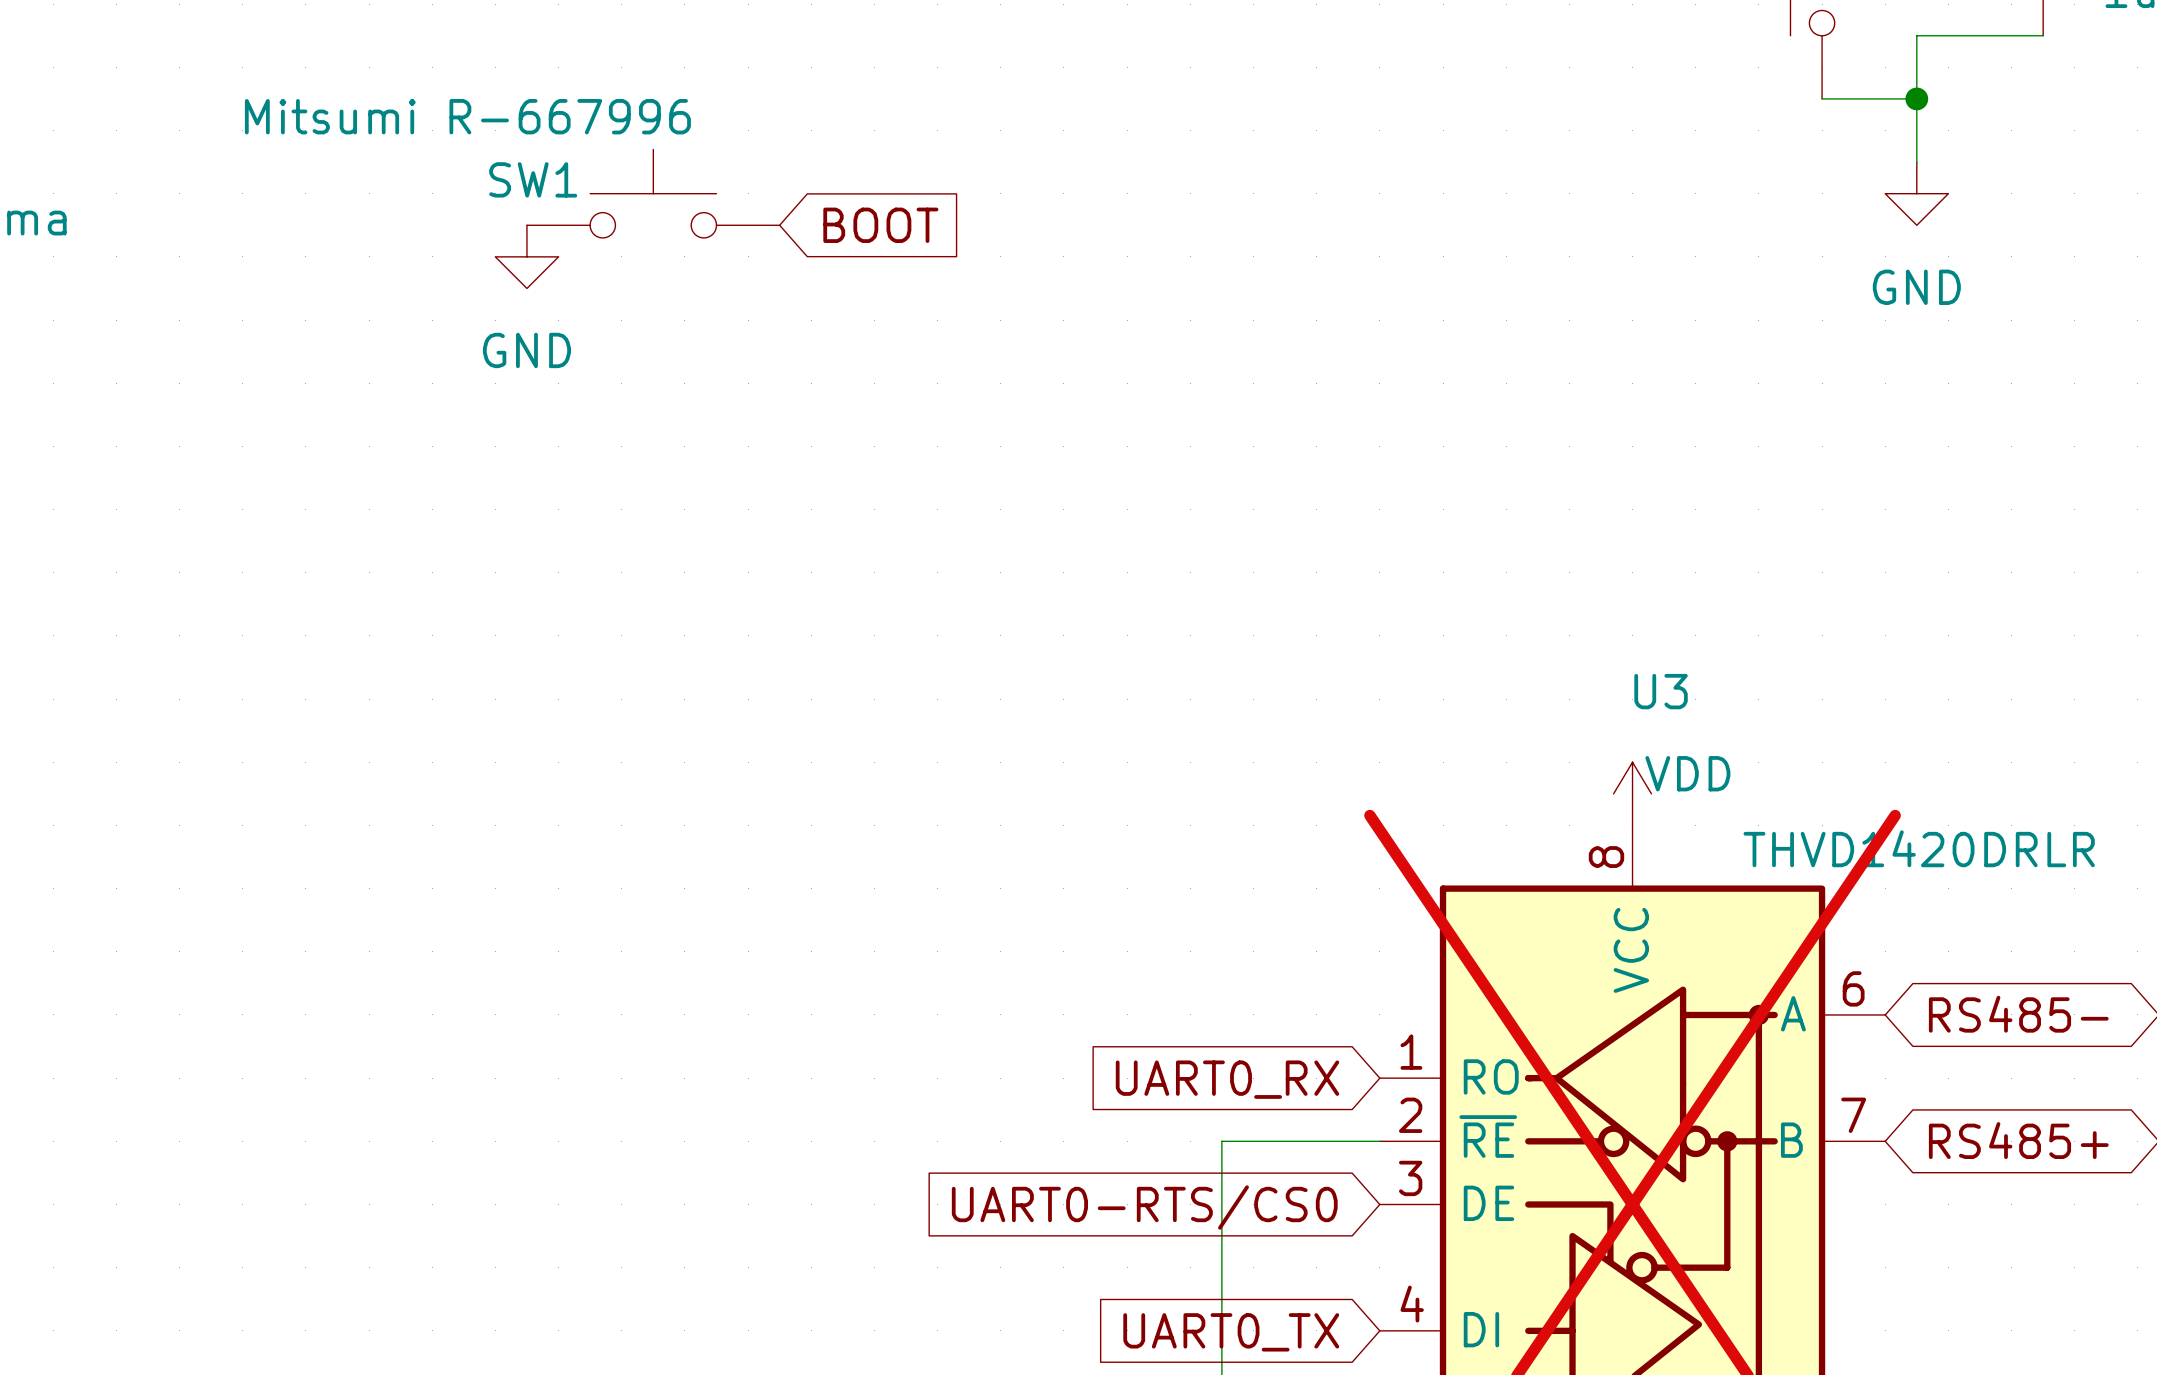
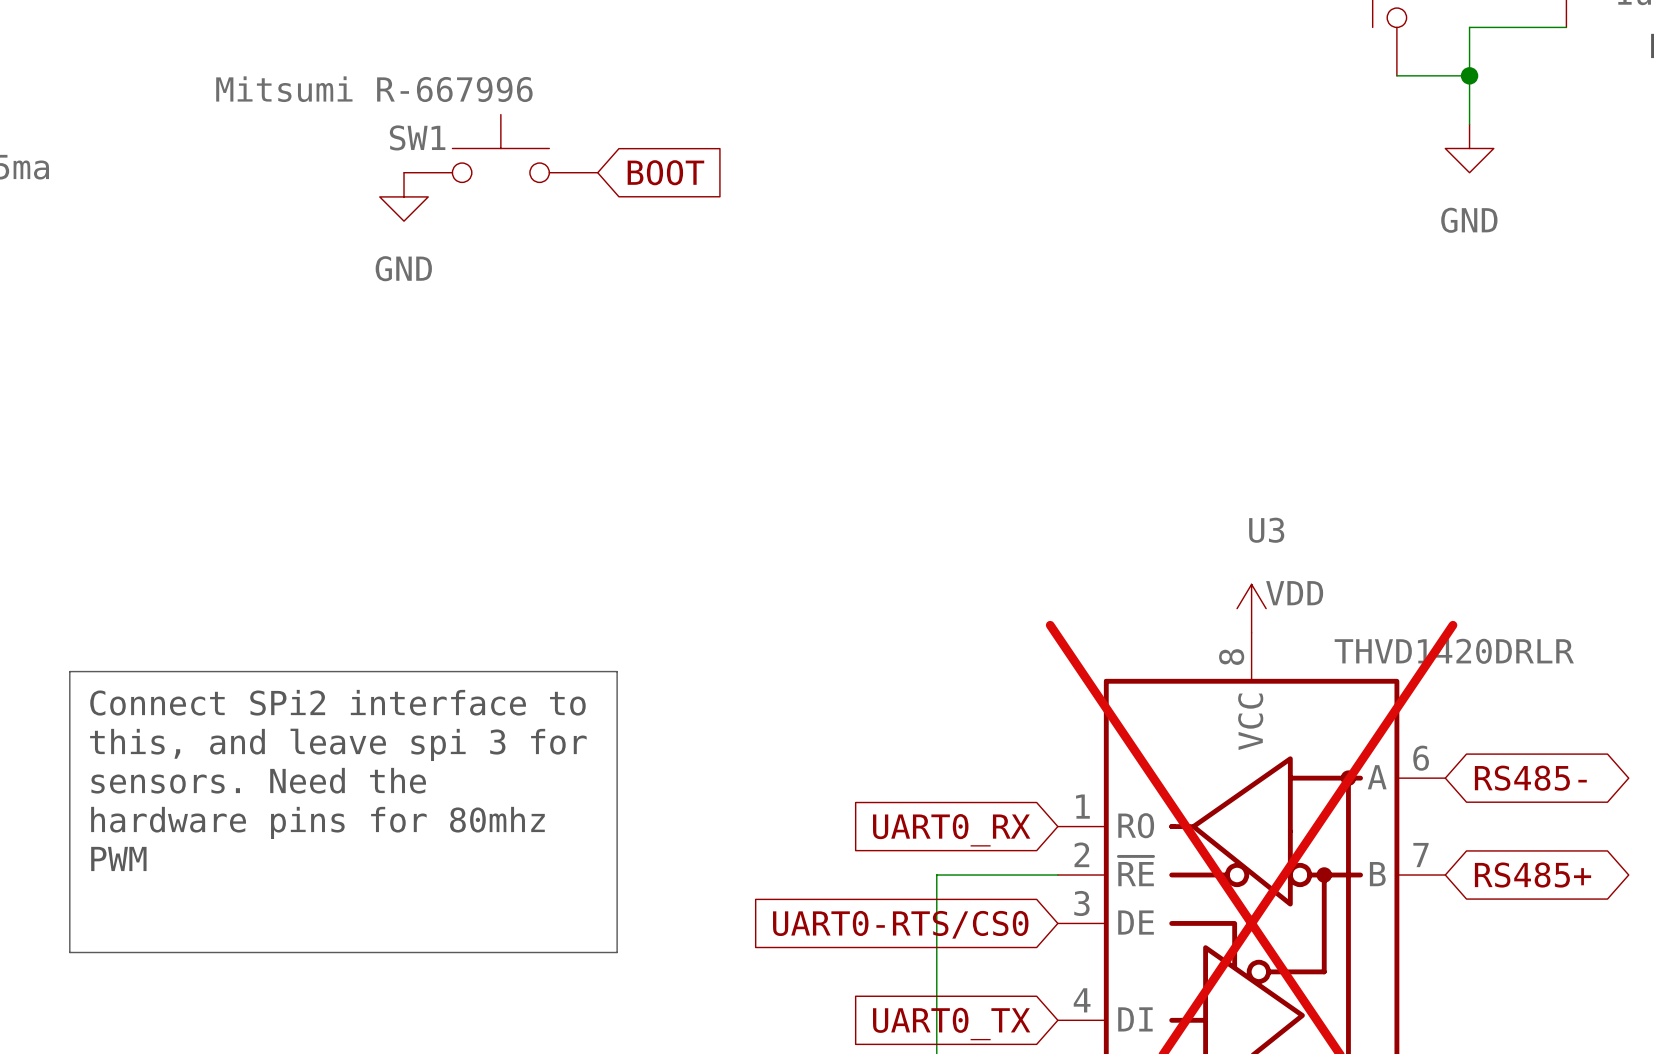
line: none -> (69, 671) (617, 671) (617, 952) (69, 952) (69, 671)
text: none -> Connect SPi2 interface to (337, 702)
text: none -> this, and leave spi 3 for (338, 744)
text: none -> sensors. Need the (258, 780)
text: none -> hardware pins for 80mhz (317, 822)
text: none -> PWM (118, 858)

